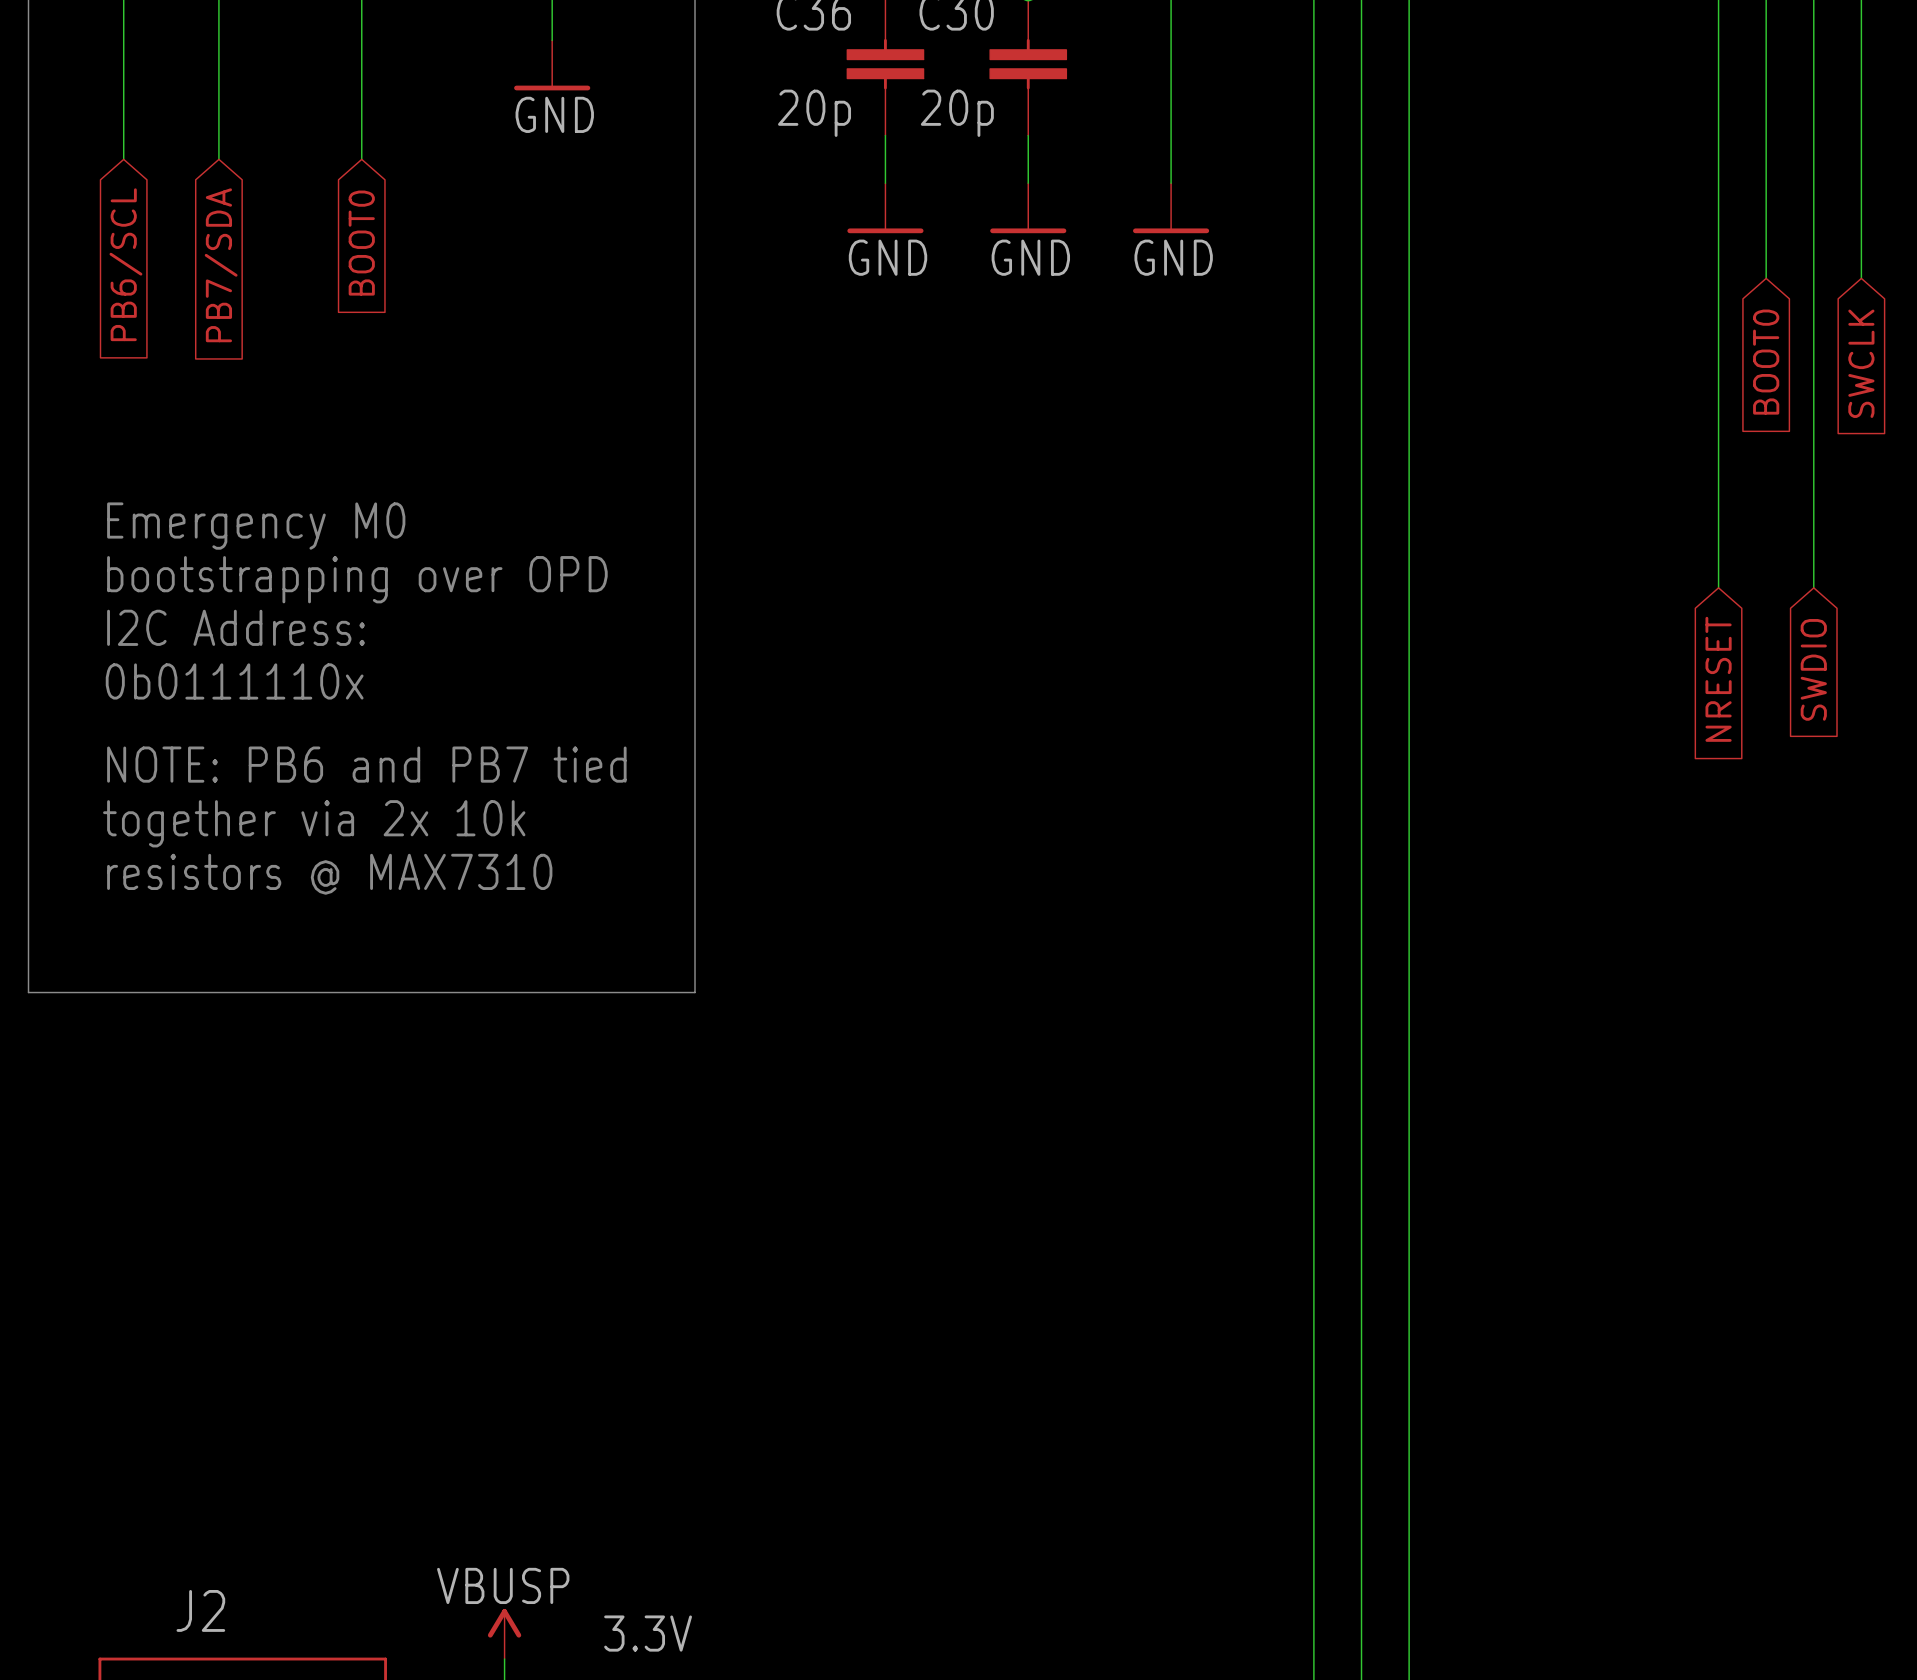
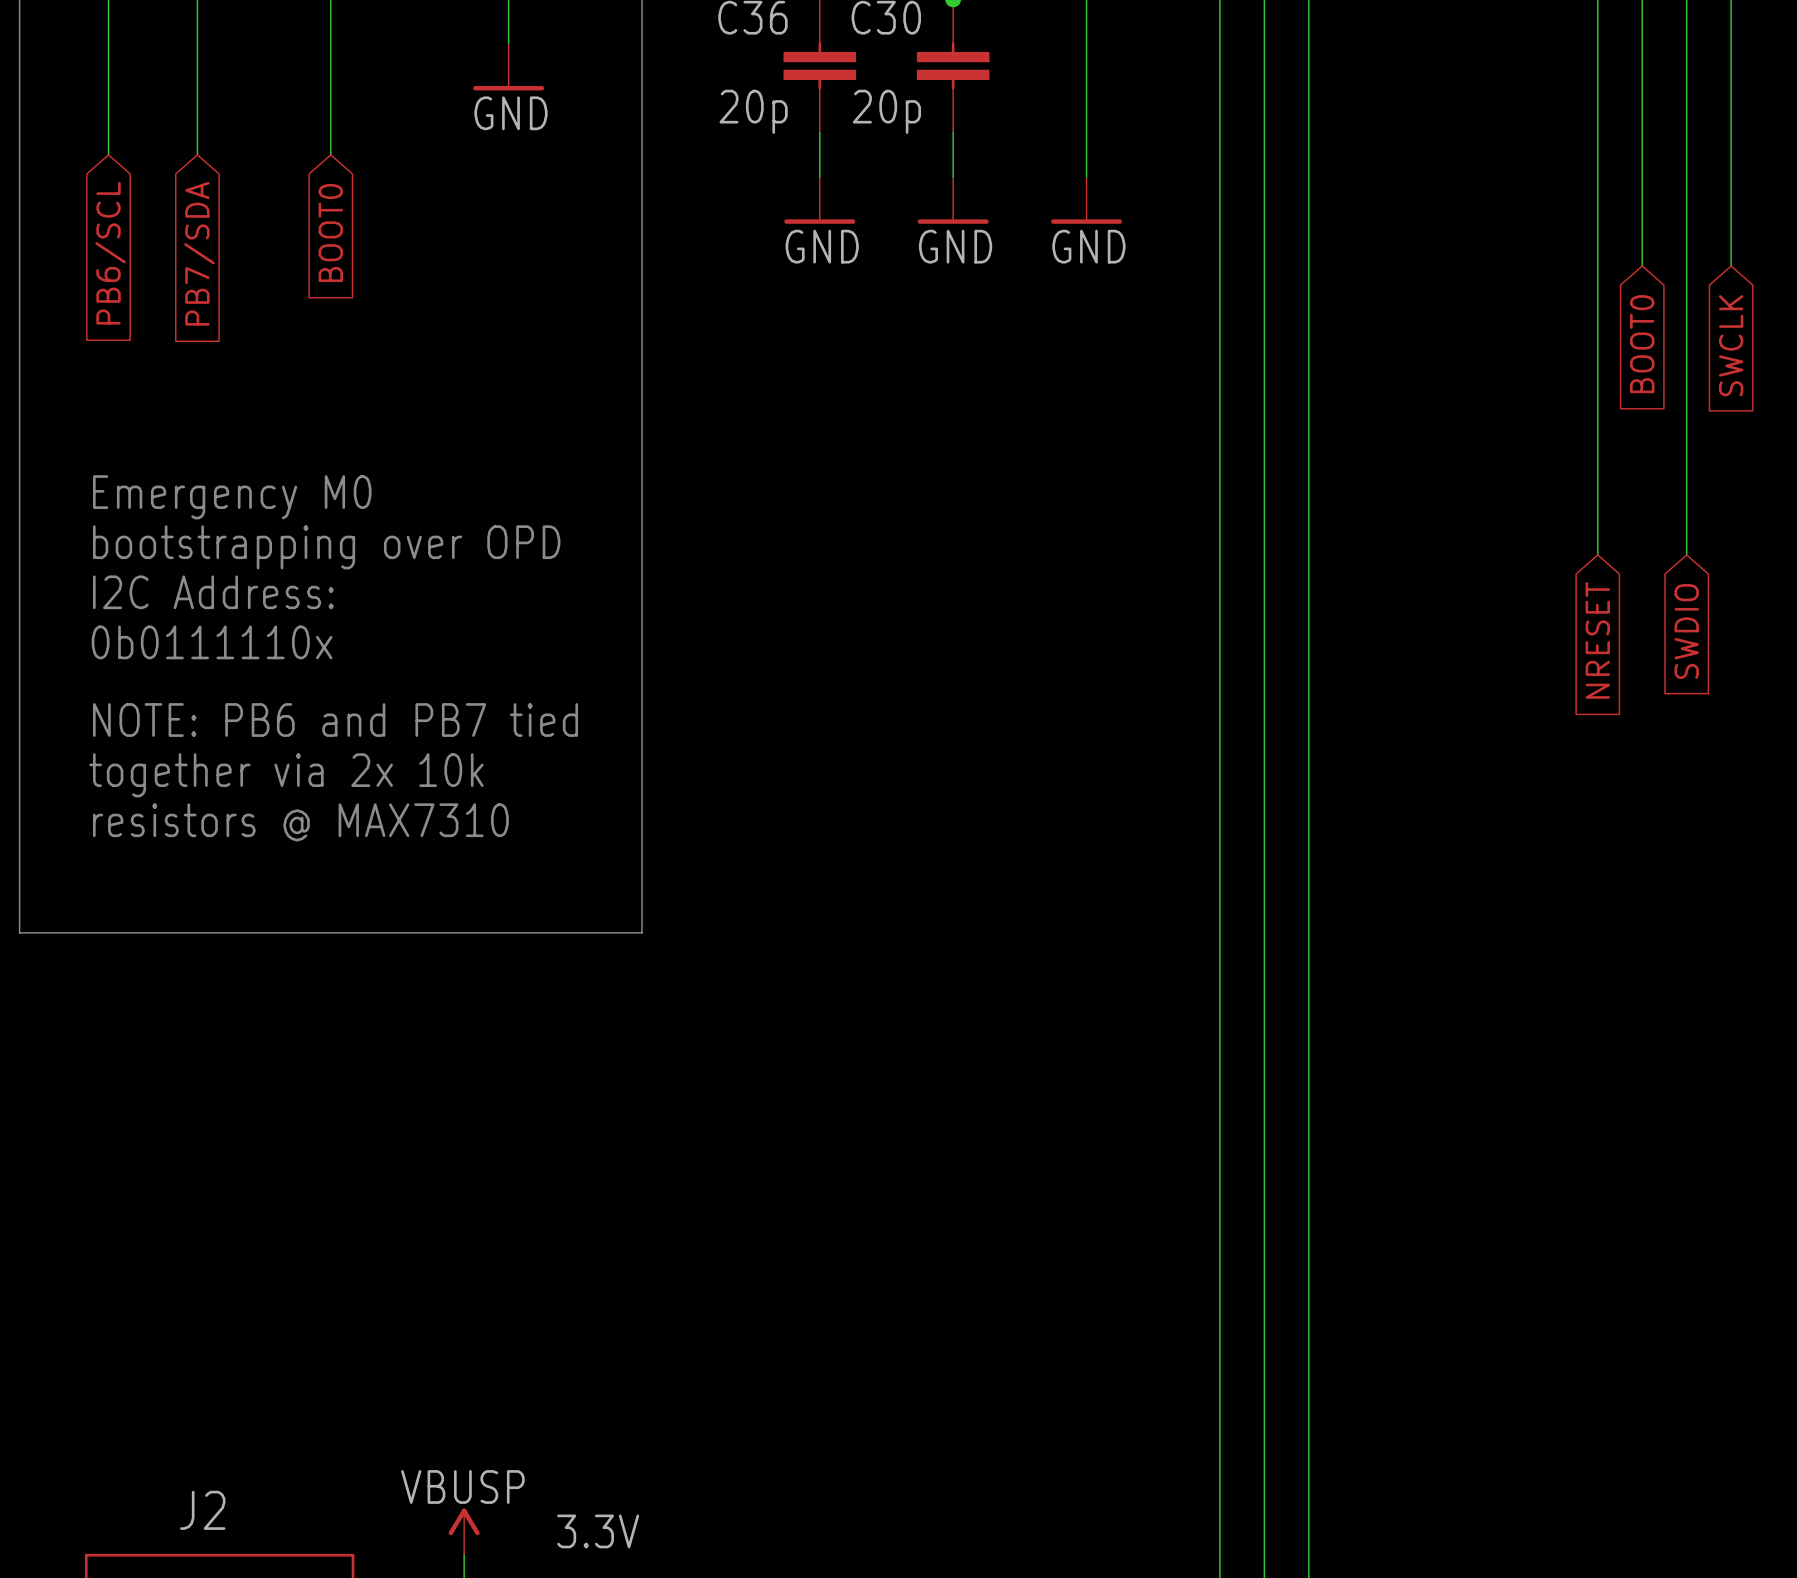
J2 name position: J2 (200, 1610) -> J2 (202, 1510)

